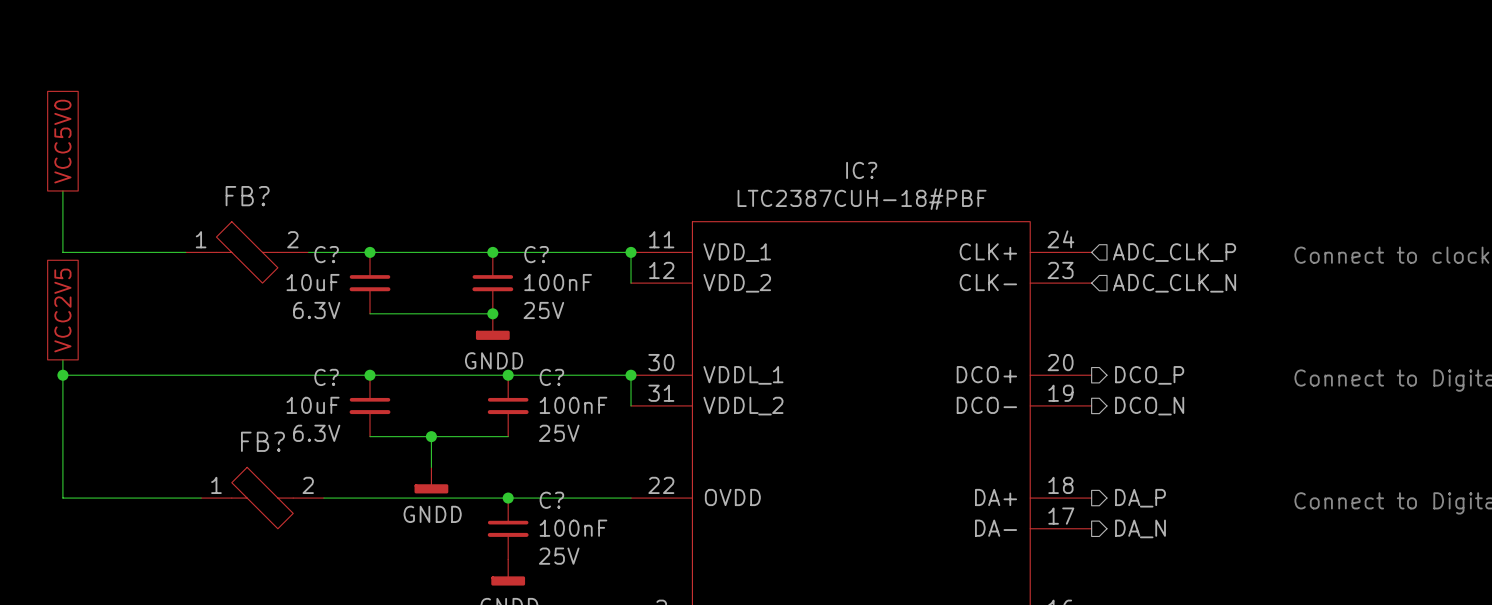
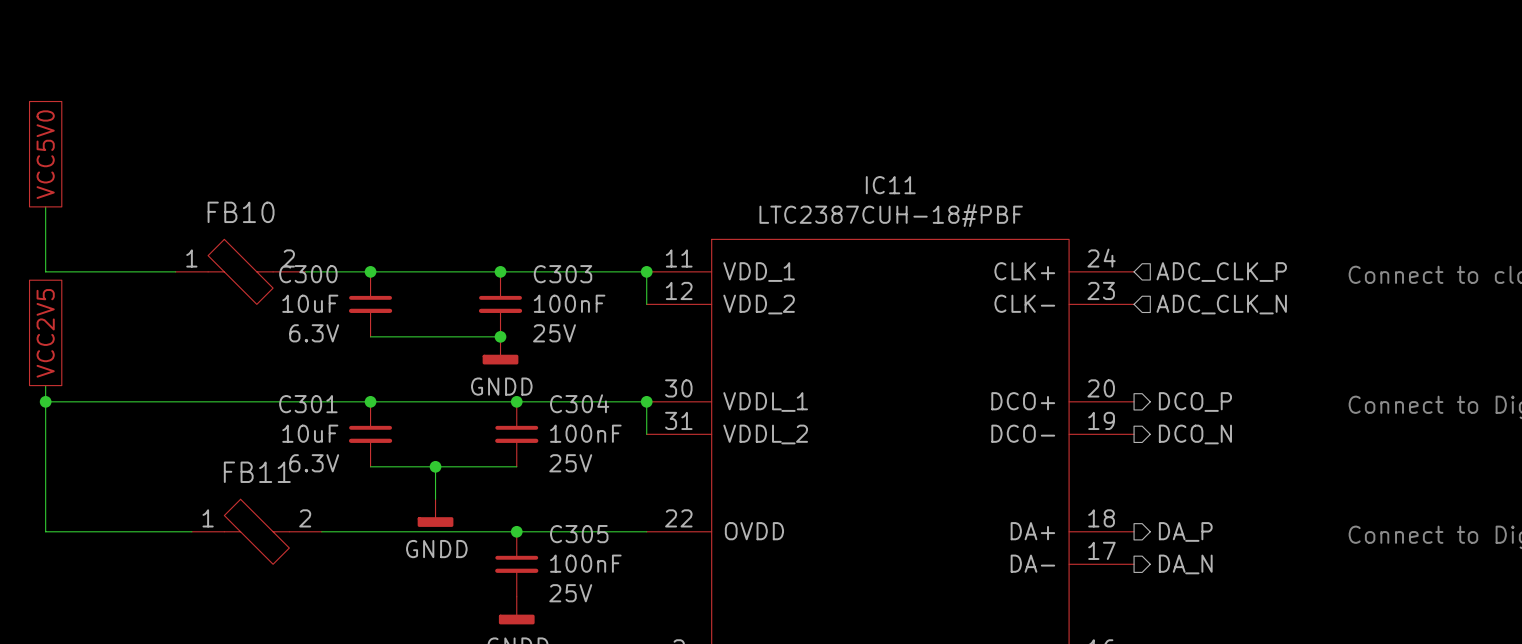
IC? name: IC? (861, 170) -> IC11 (890, 185)
FB? name: FB? (247, 196) -> FB10 (241, 212)
C? name: C? (326, 254) -> C300 (308, 274)
C? name: C? (536, 254) -> C303 (563, 274)
C? name: C? (326, 377) -> C301 (308, 404)
C? name: C? (551, 377) -> C304 (579, 403)
FB? name: FB? (262, 441) -> FB11 (257, 472)
C? name: C? (551, 500) -> C305 (579, 534)

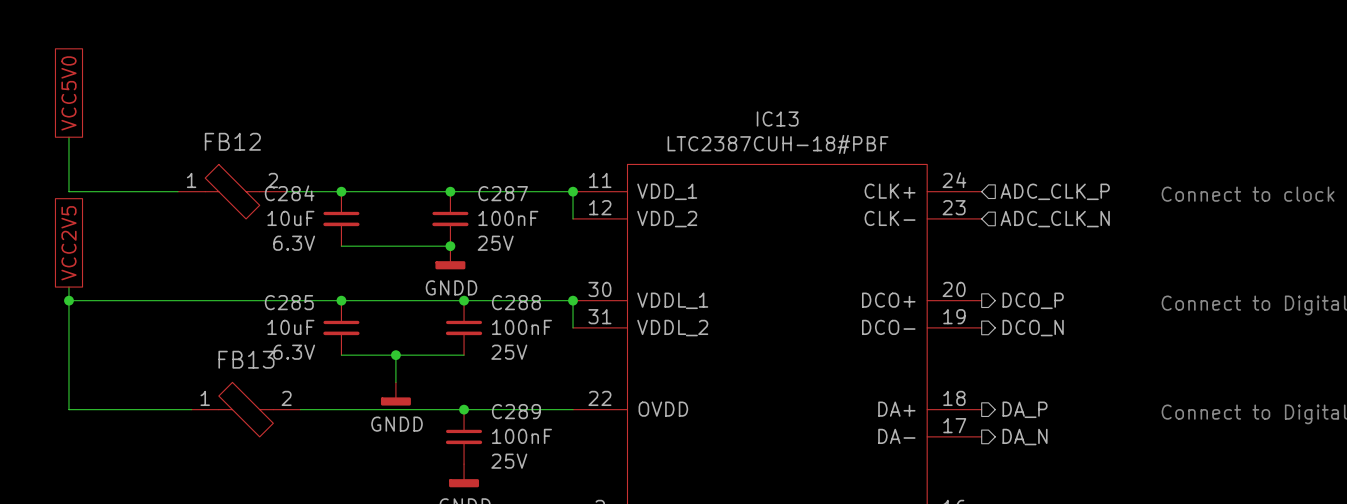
IC11 name: IC11 (890, 185) -> IC13 (777, 118)
FB10 name: FB10 (241, 212) -> FB12 (232, 141)
C300 name: C300 (308, 274) -> C284 (289, 193)
C303 name: C303 (563, 274) -> C287 (503, 193)
C304 name: C304 (579, 403) -> C288 (516, 302)
C301 name: C301 (308, 404) -> C285 (289, 302)
FB11 name: FB11 (257, 472) -> FB13 (246, 359)
C305 name: C305 (579, 534) -> C289 (516, 411)

